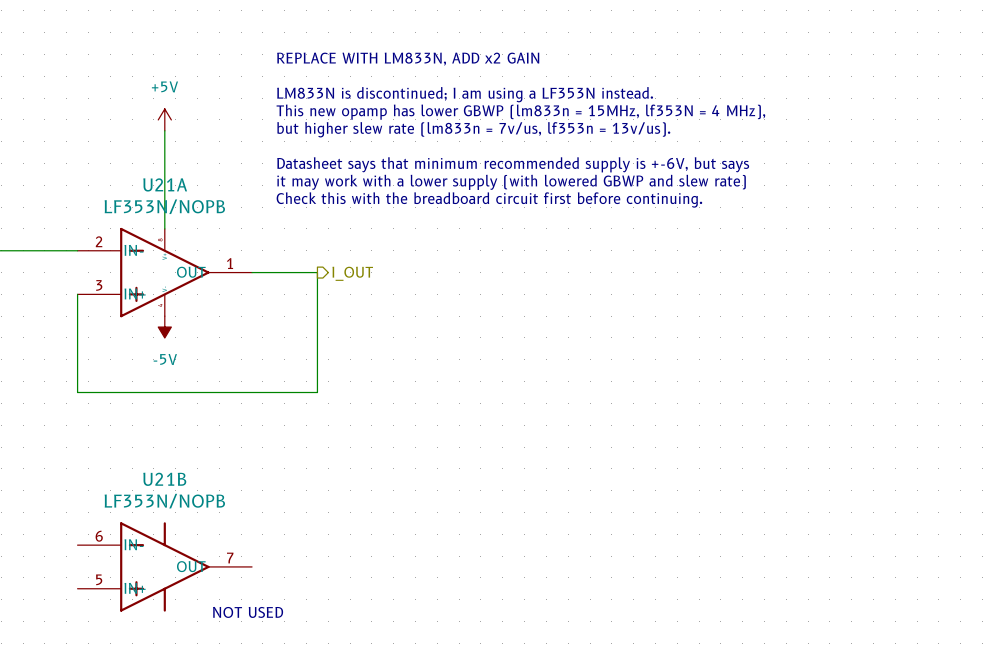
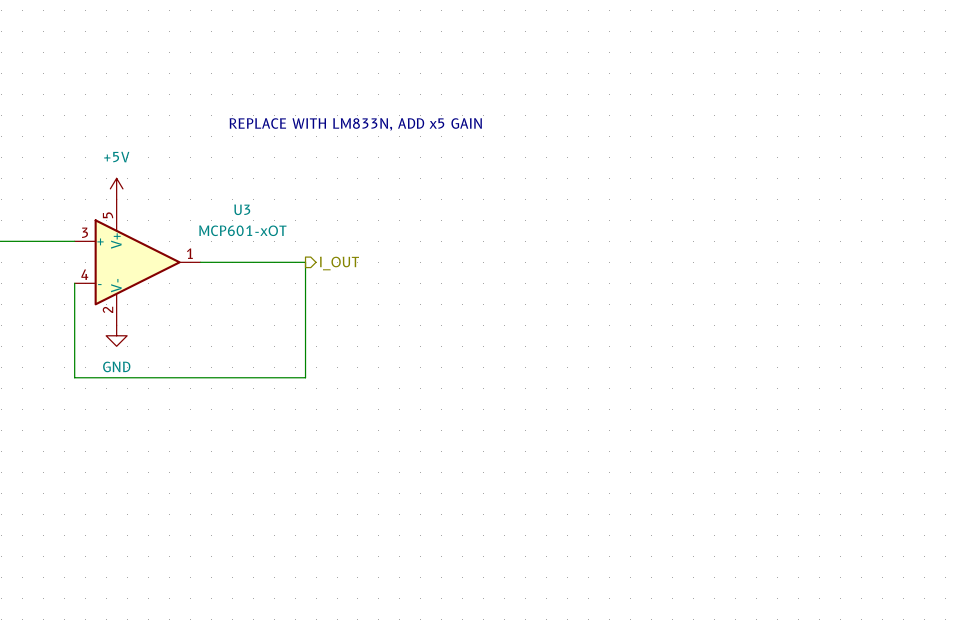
text: REPLACE WITH LM833N, ADD x2 GAIN (408, 59) -> none
text: LM833N is discontinued; I am using a LF353N instead. (465, 94) -> none
text: This new opamp has lower GBWP (lm833n = 15MHz, lf353N = 4 MHz), (520, 112) -> none
power symbol position: +5V (164, 119) -> +5V (116, 188)
text: none -> REPLACE WITH LM833N, ADD x5 GAIN (355, 124)
text: but higher slew rate (lm833n = 7v/us, lf353n = 13v/us). (473, 129) -> none
wire: (164, 130) (164, 228) -> none
text: Datasheet says that minimum recommended supply is +-6V, but says (513, 164) -> none
text: it may work with a lower supply (with lowered GBWP and slew rate) (511, 182) -> none
text: Check this with the breadboard circuit first before continuing. (489, 199) -> none
U3: none -> MCP601-xOT (137, 262)
U21A: LF353N/NOPB (164, 272) -> none
power symbol: -5V (164, 327) -> none
power symbol: none -> GND (116, 335)
U21B: LF353N/NOPB (164, 566) -> none
text: NOT USED (248, 612) -> none

